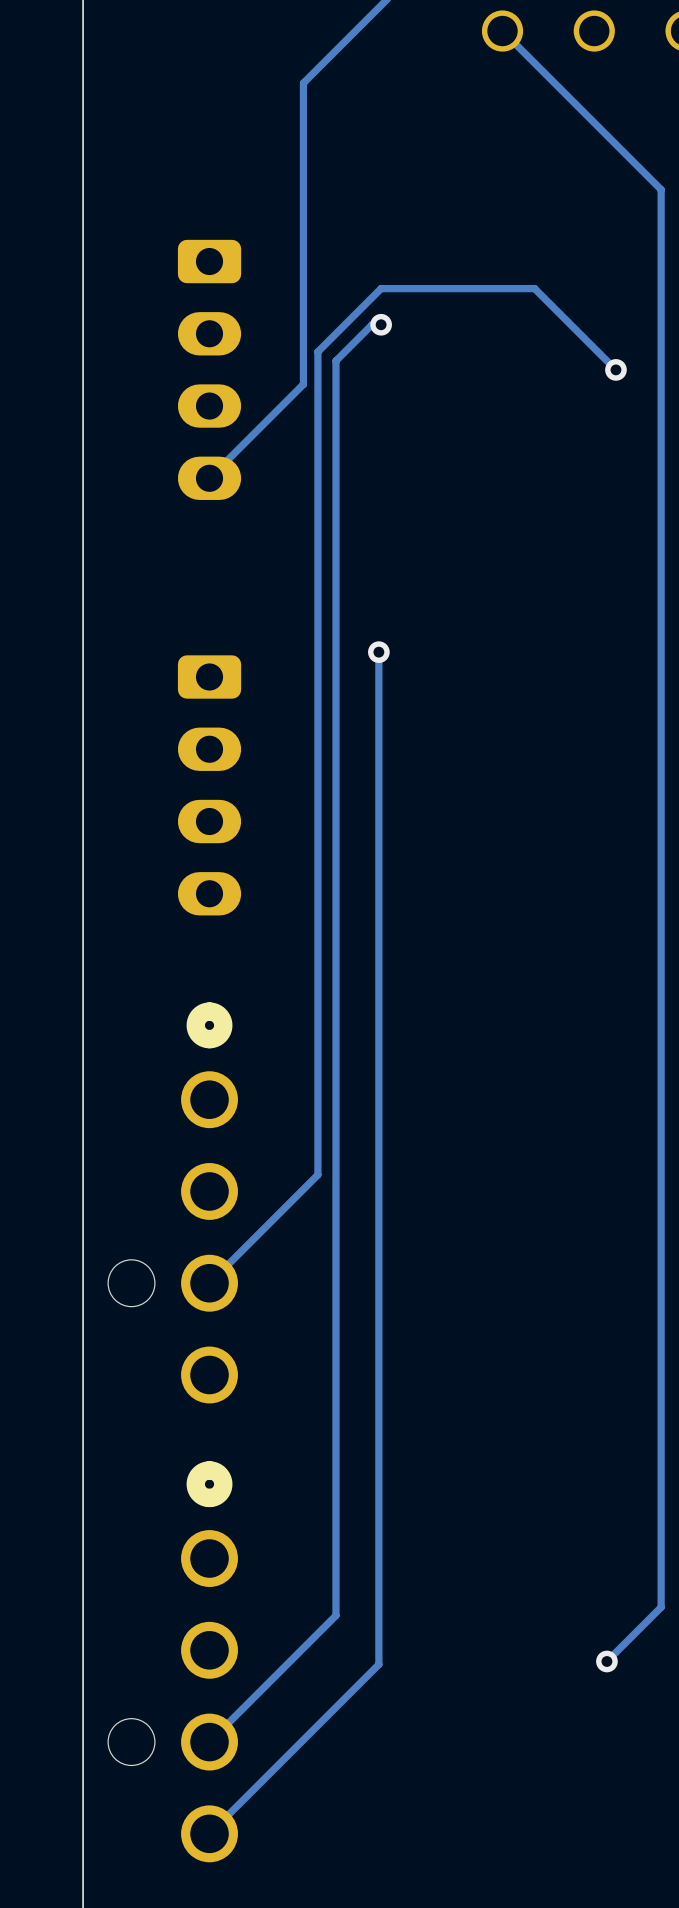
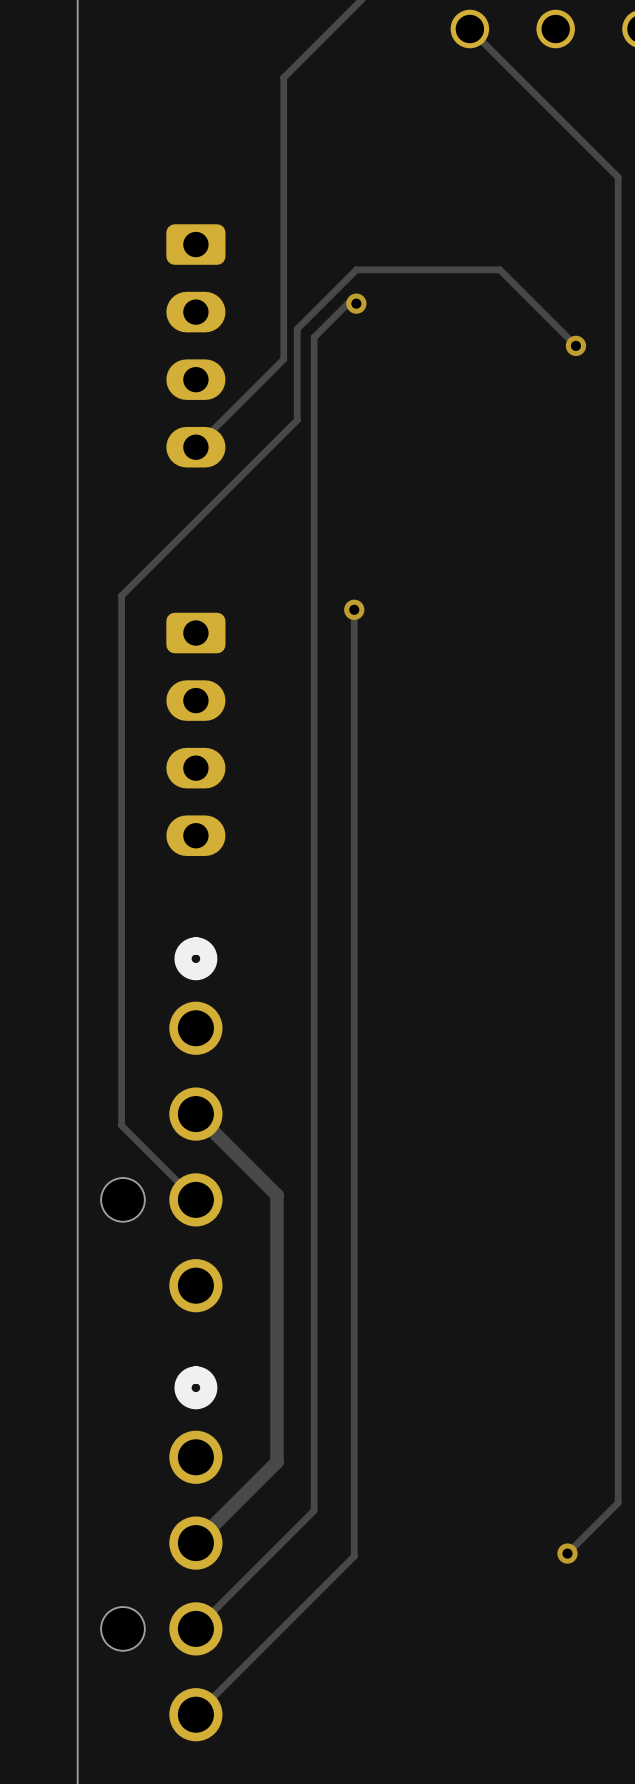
track: (317, 449) (317, 1174) (209, 1283) -> (297, 420) (121, 595) (121, 1125) (195, 1199)
track: none -> (195, 1114) (276, 1195) (276, 1462) (195, 1543)

